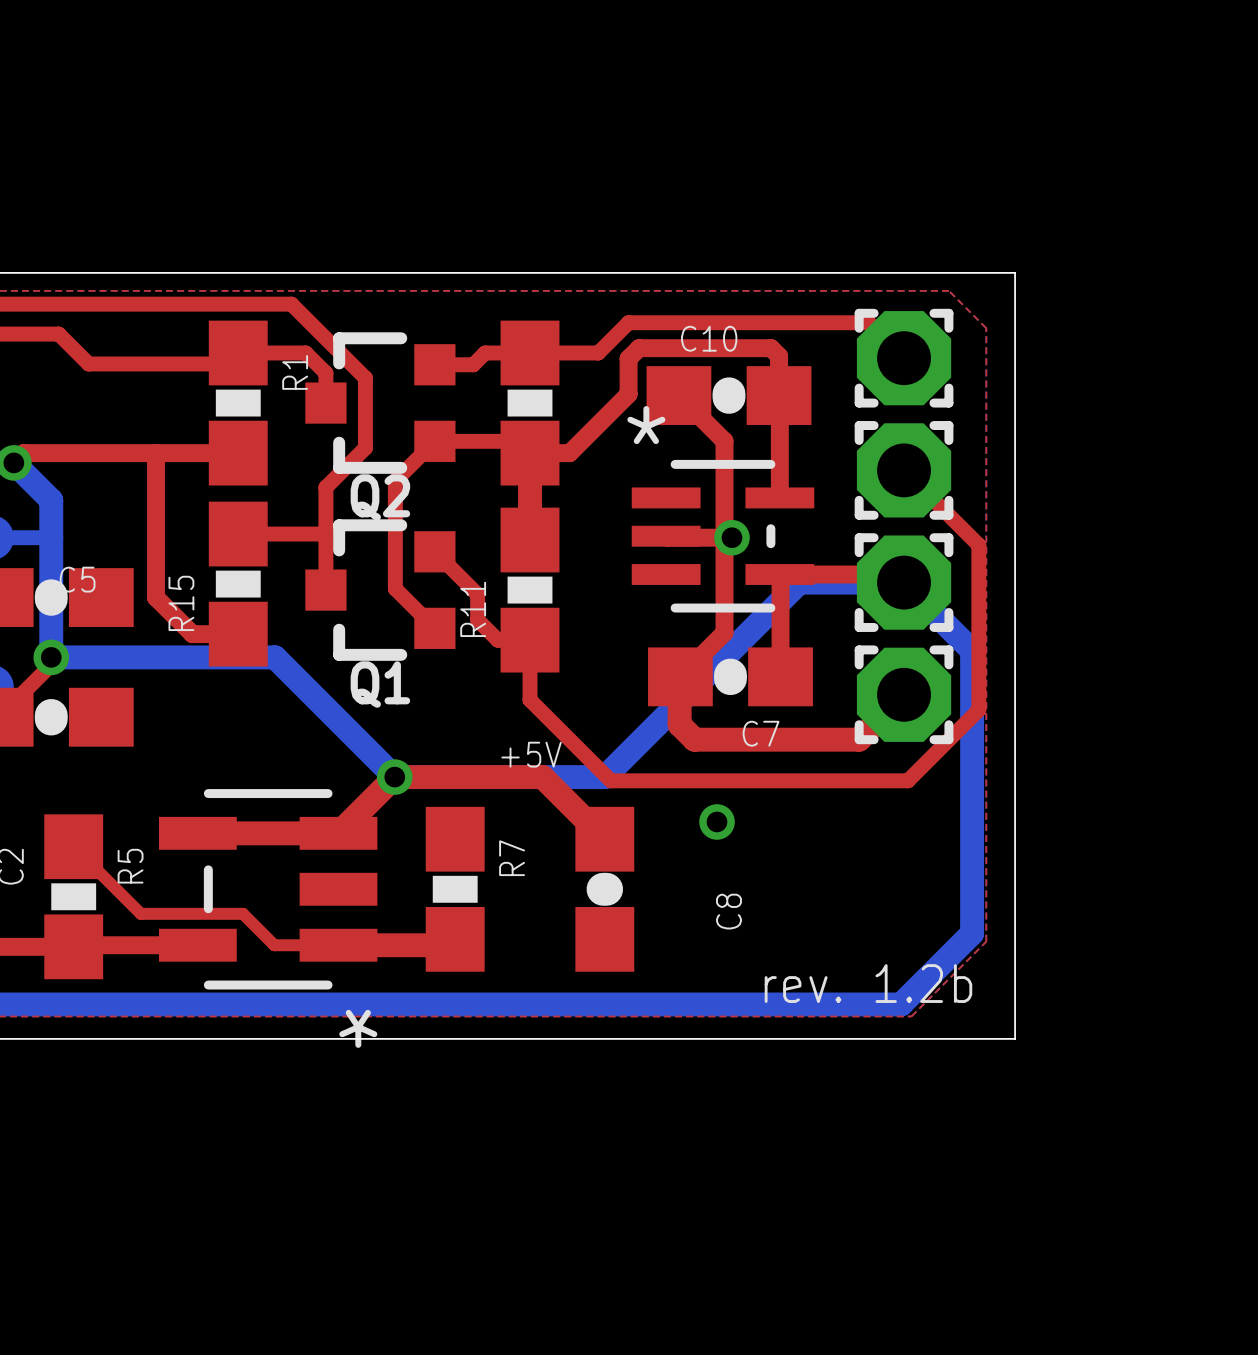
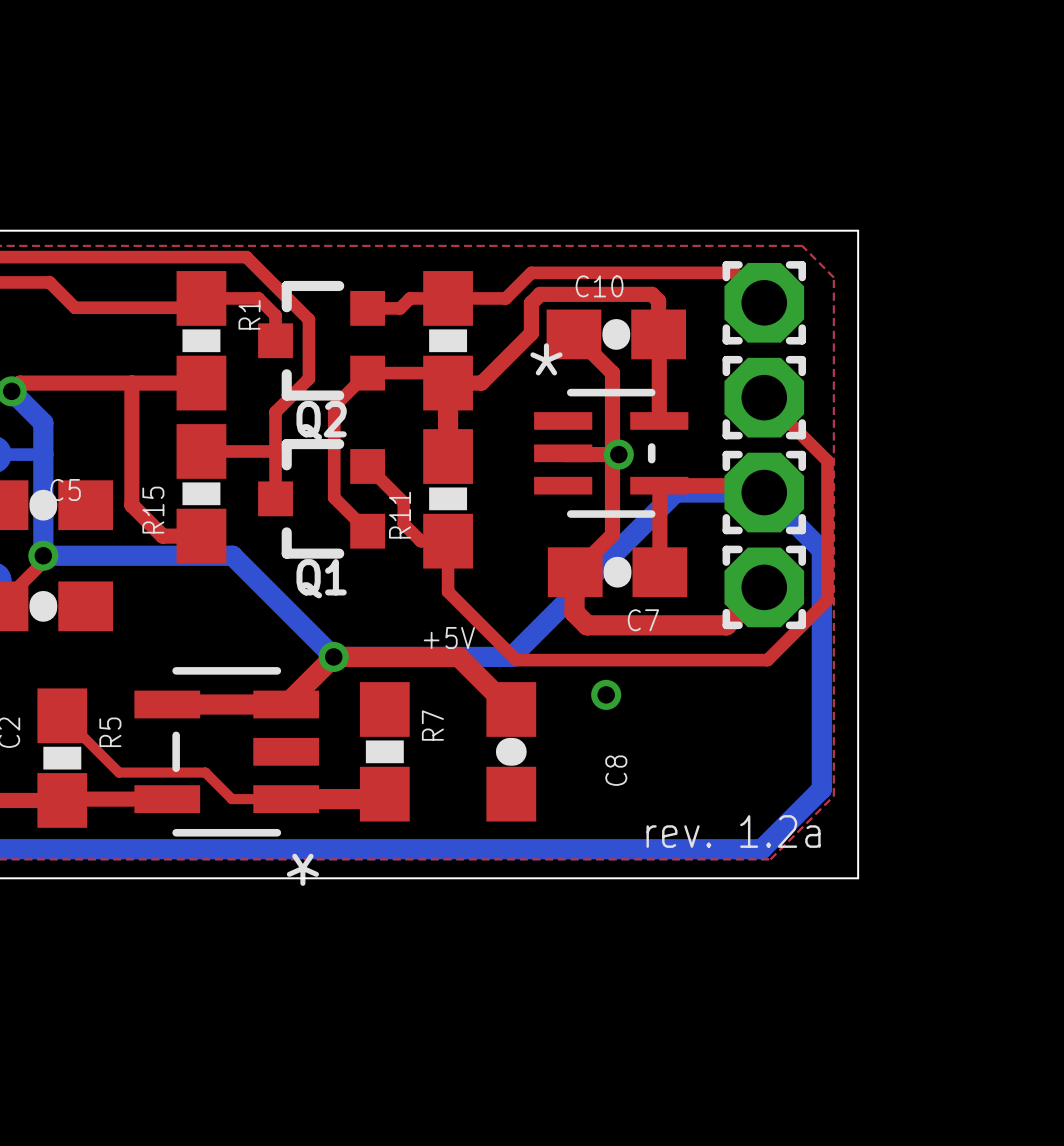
text: rev. 1.2b (868, 983) -> rev. 1.2a (733, 831)

